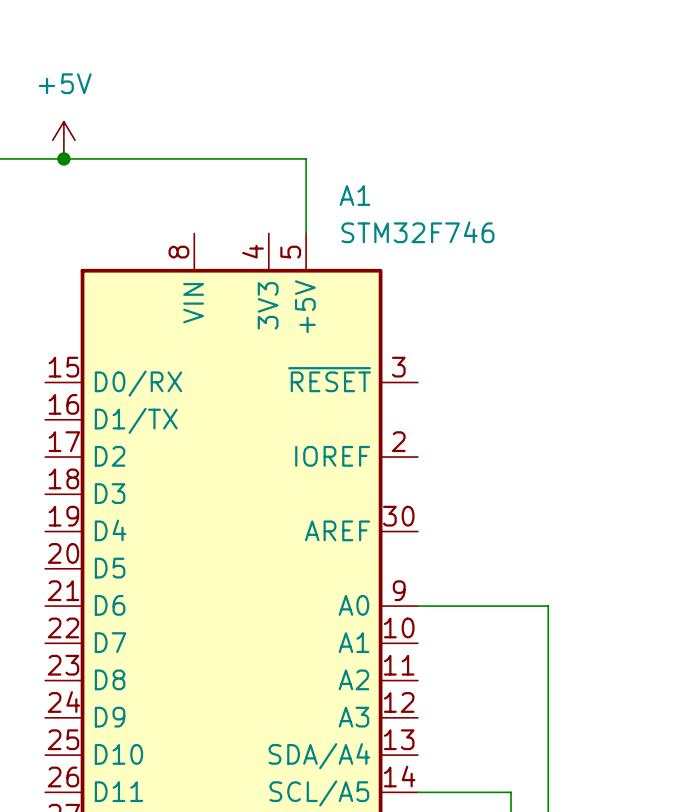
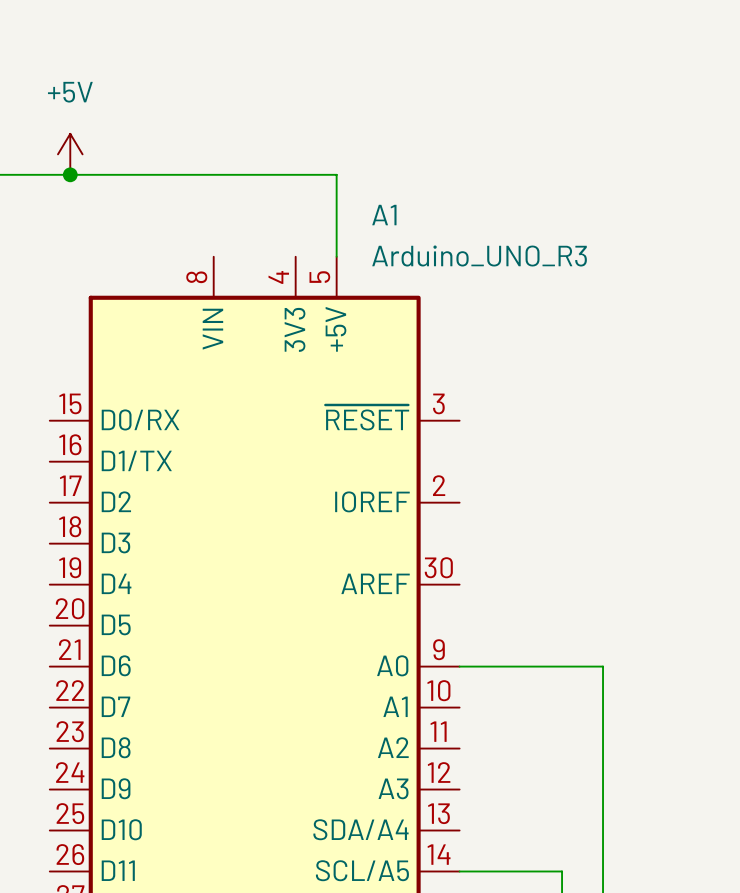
A1 value: STM32F746 (417, 232) -> Arduino_UNO_R3 (479, 255)

